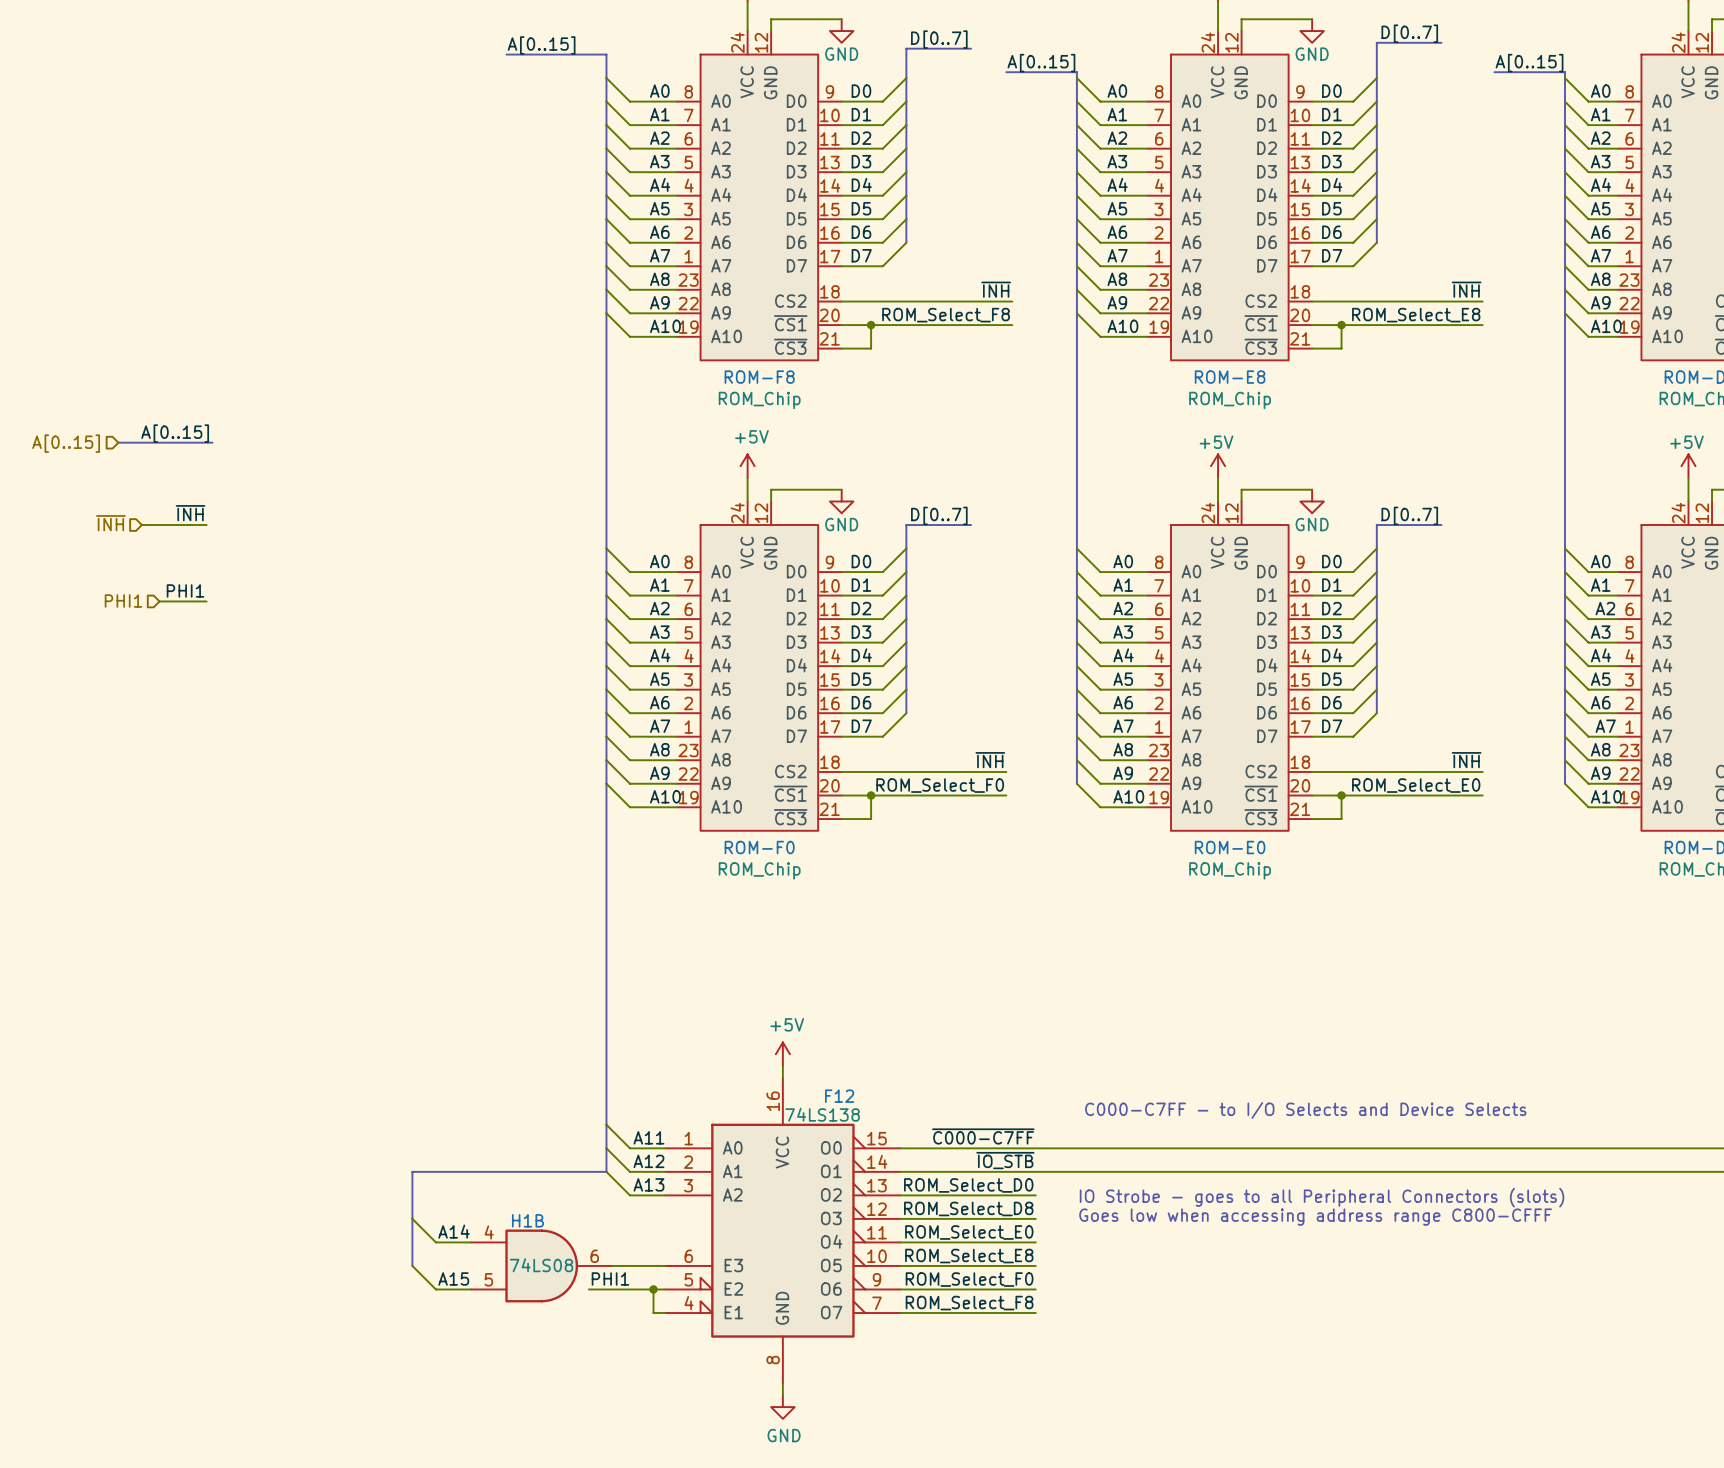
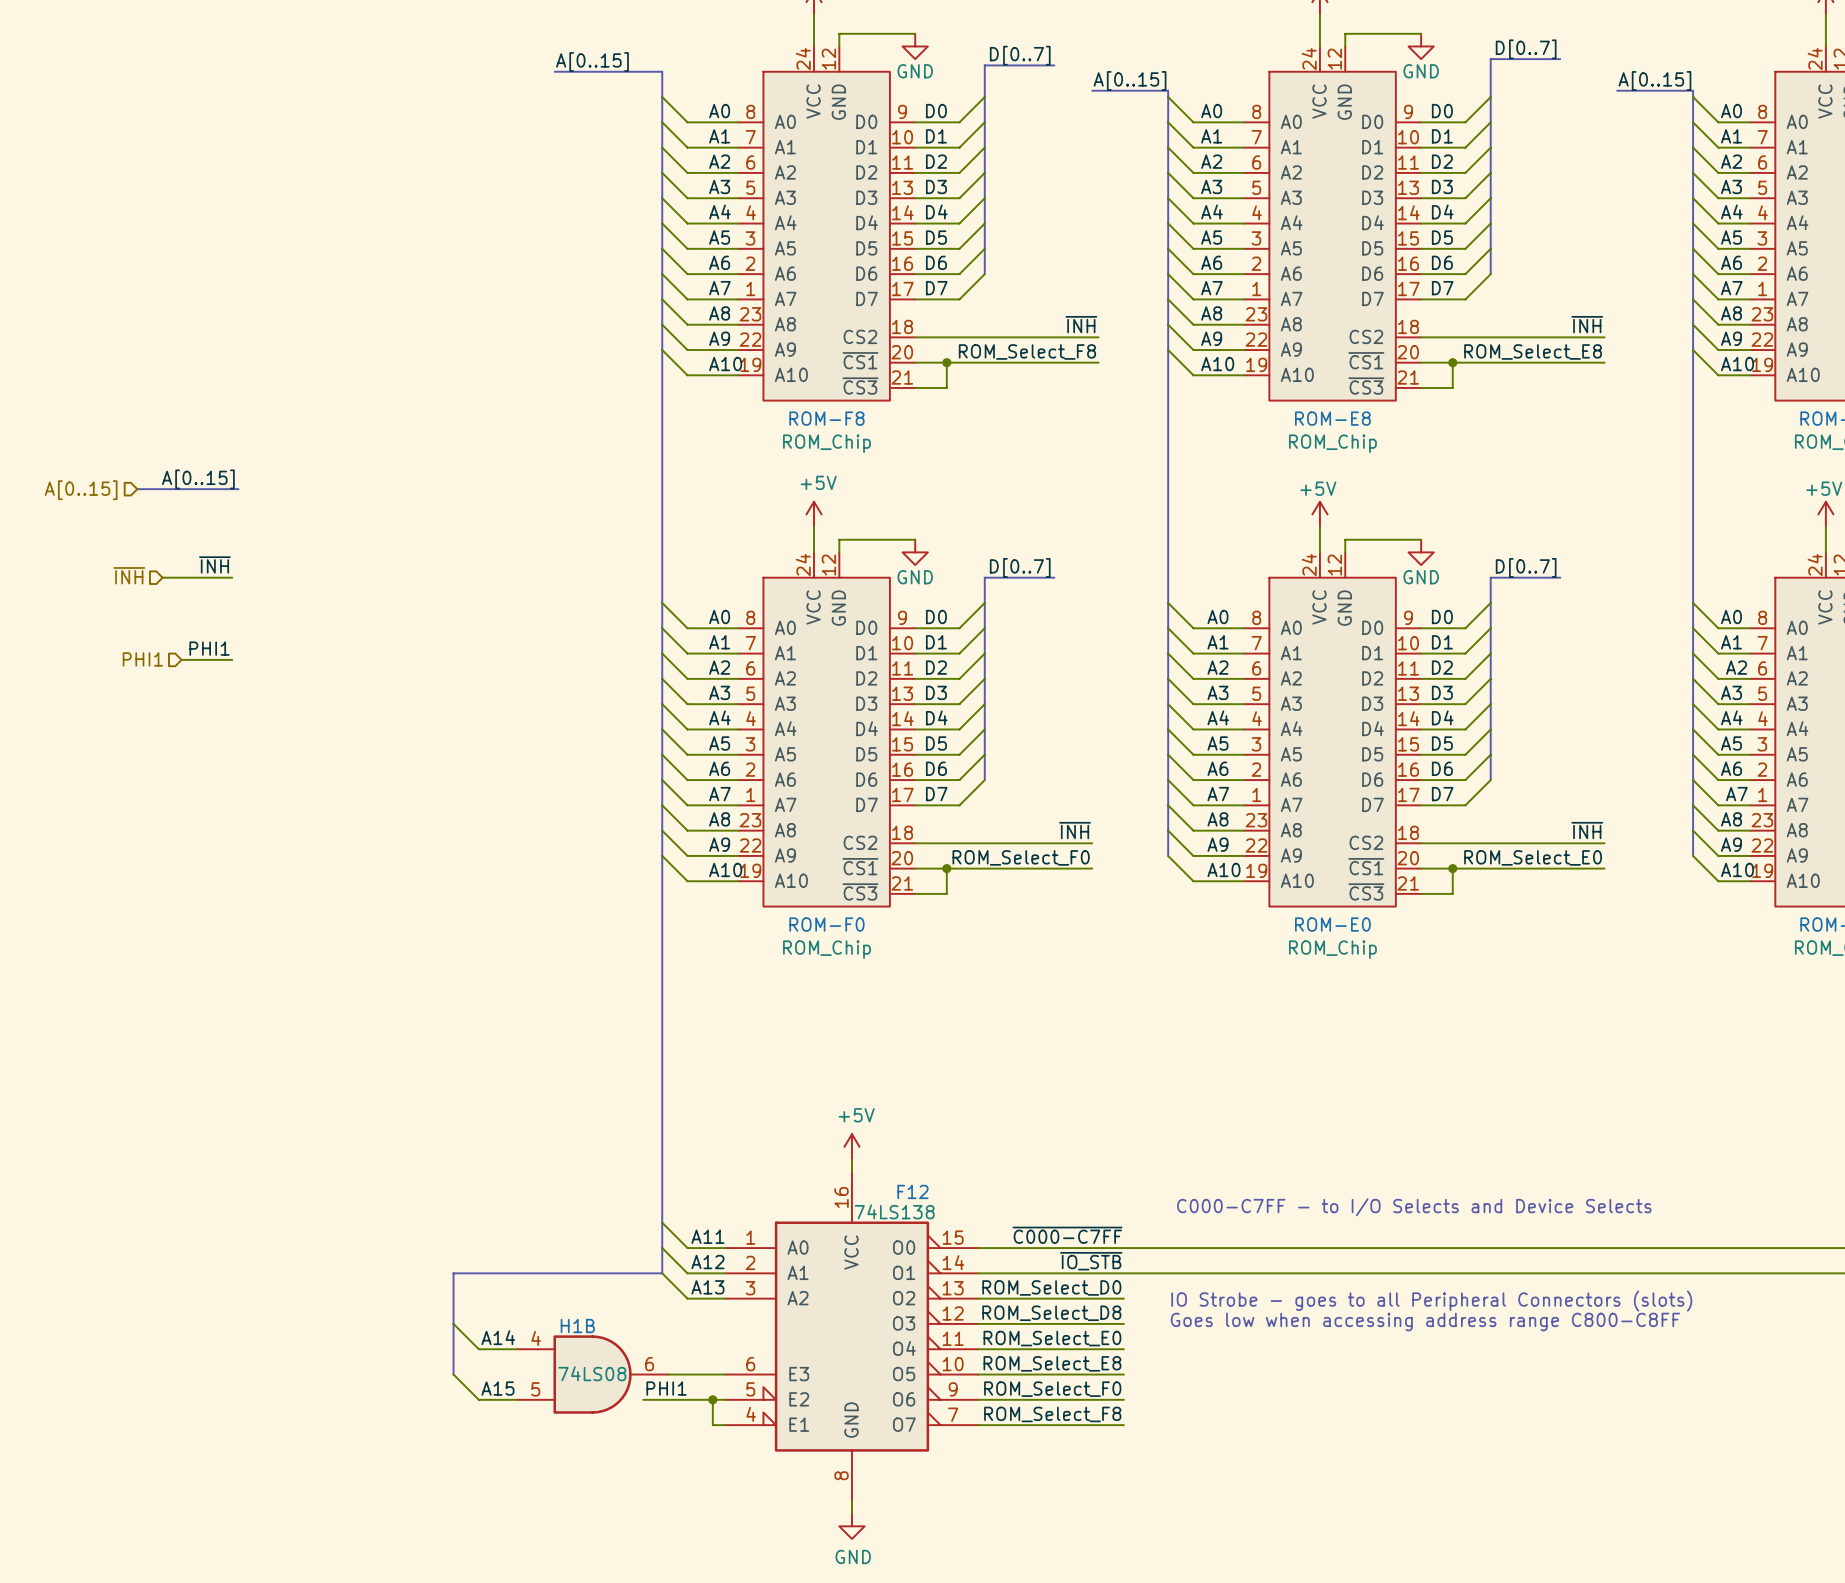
text: Goes low when accessing address range C800-CFFF (1315, 1217) -> Goes low when accessing address range C800-C8FF (1425, 1322)

